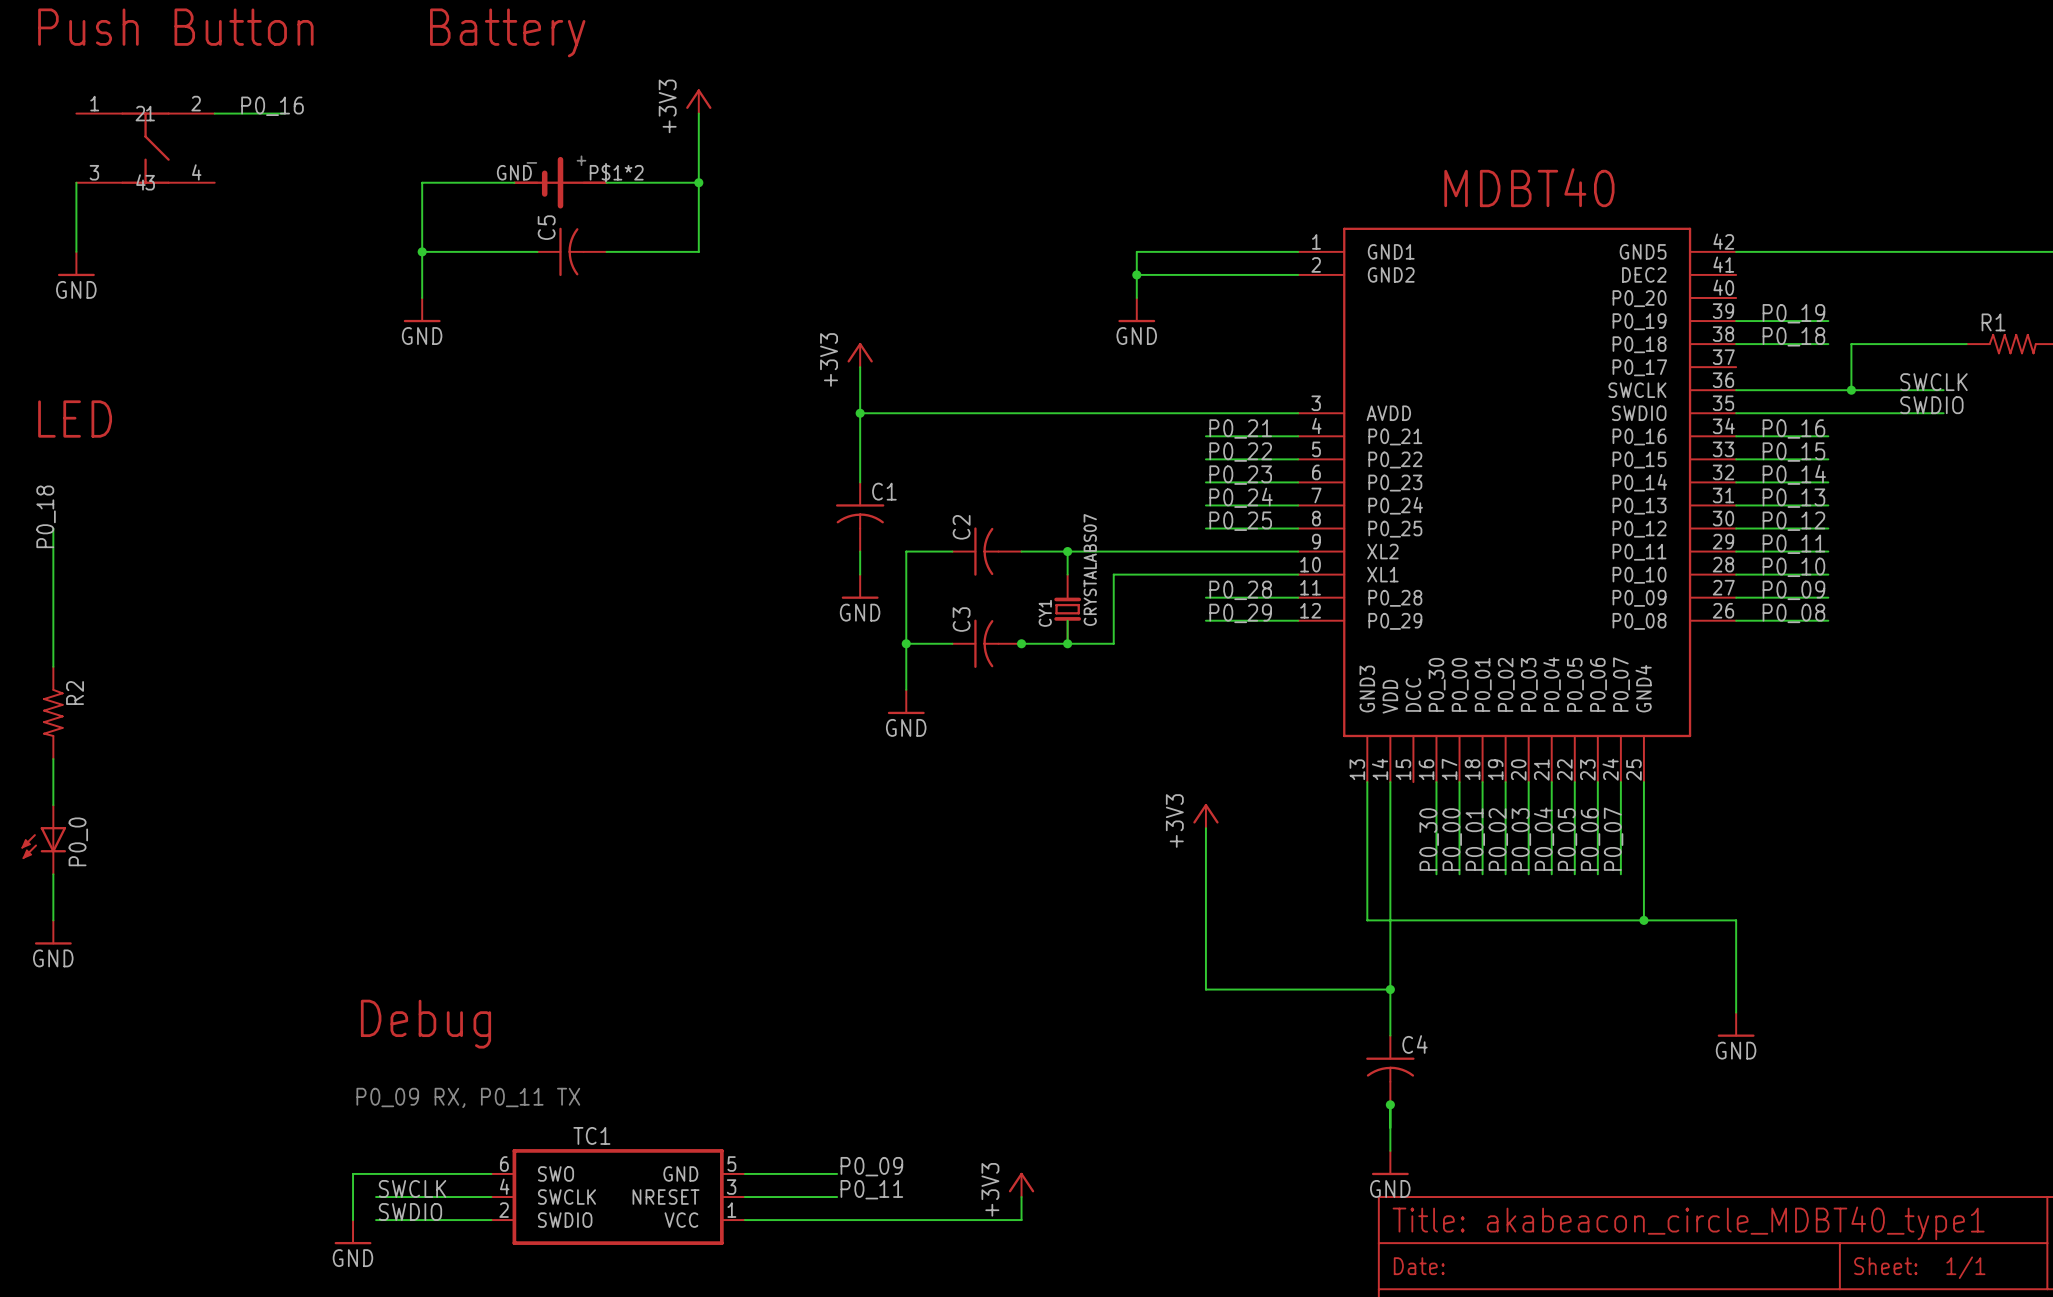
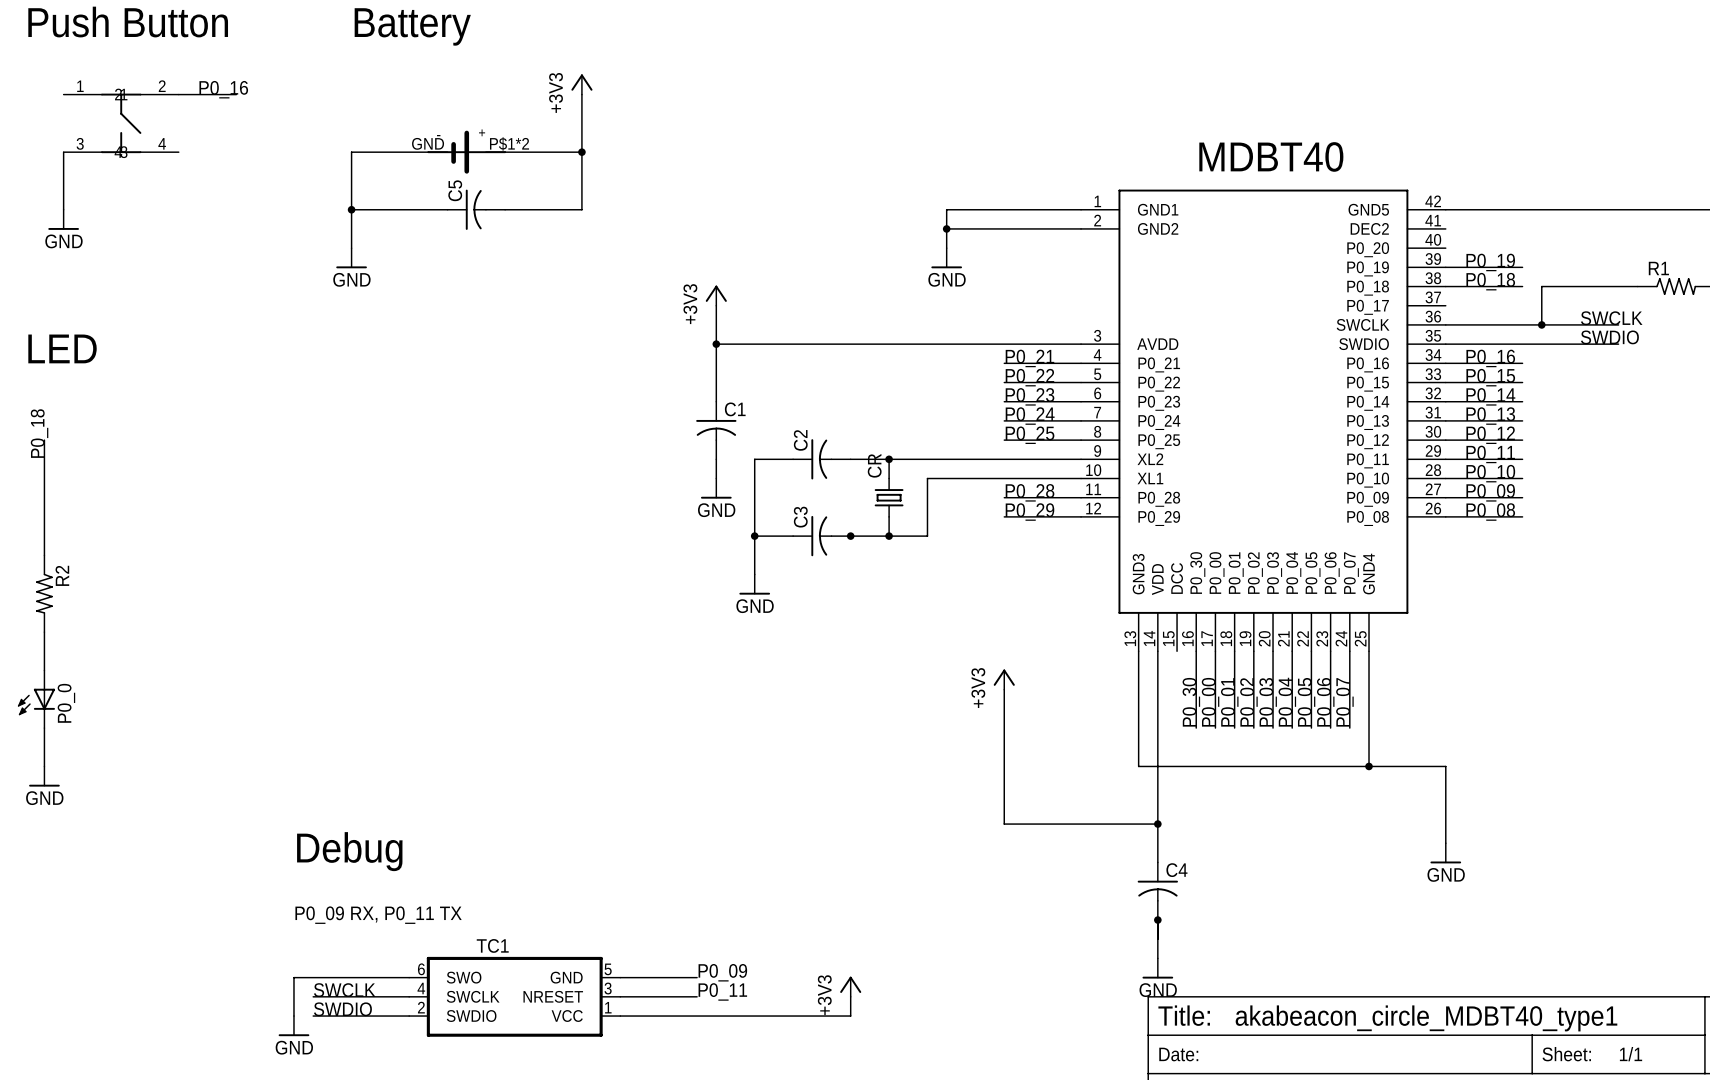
CR: none -> (889, 497)
CY1: CRYSTALABS07 (1067, 609) -> none

